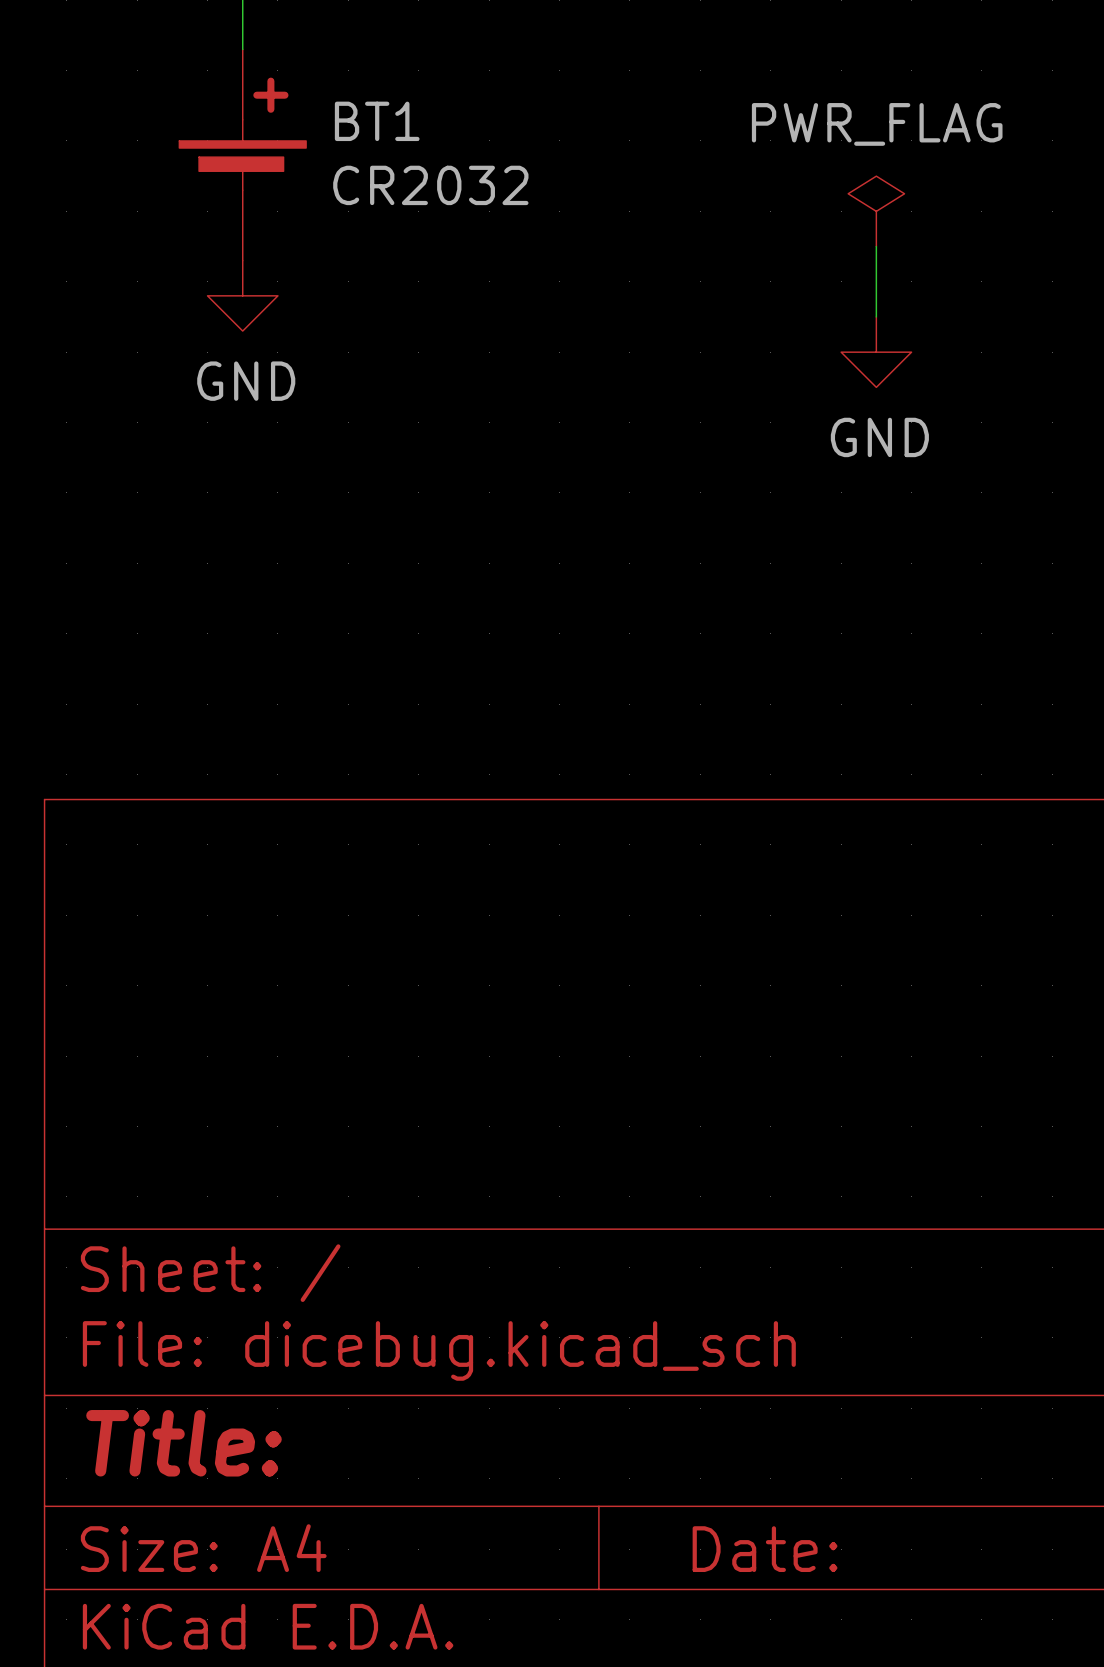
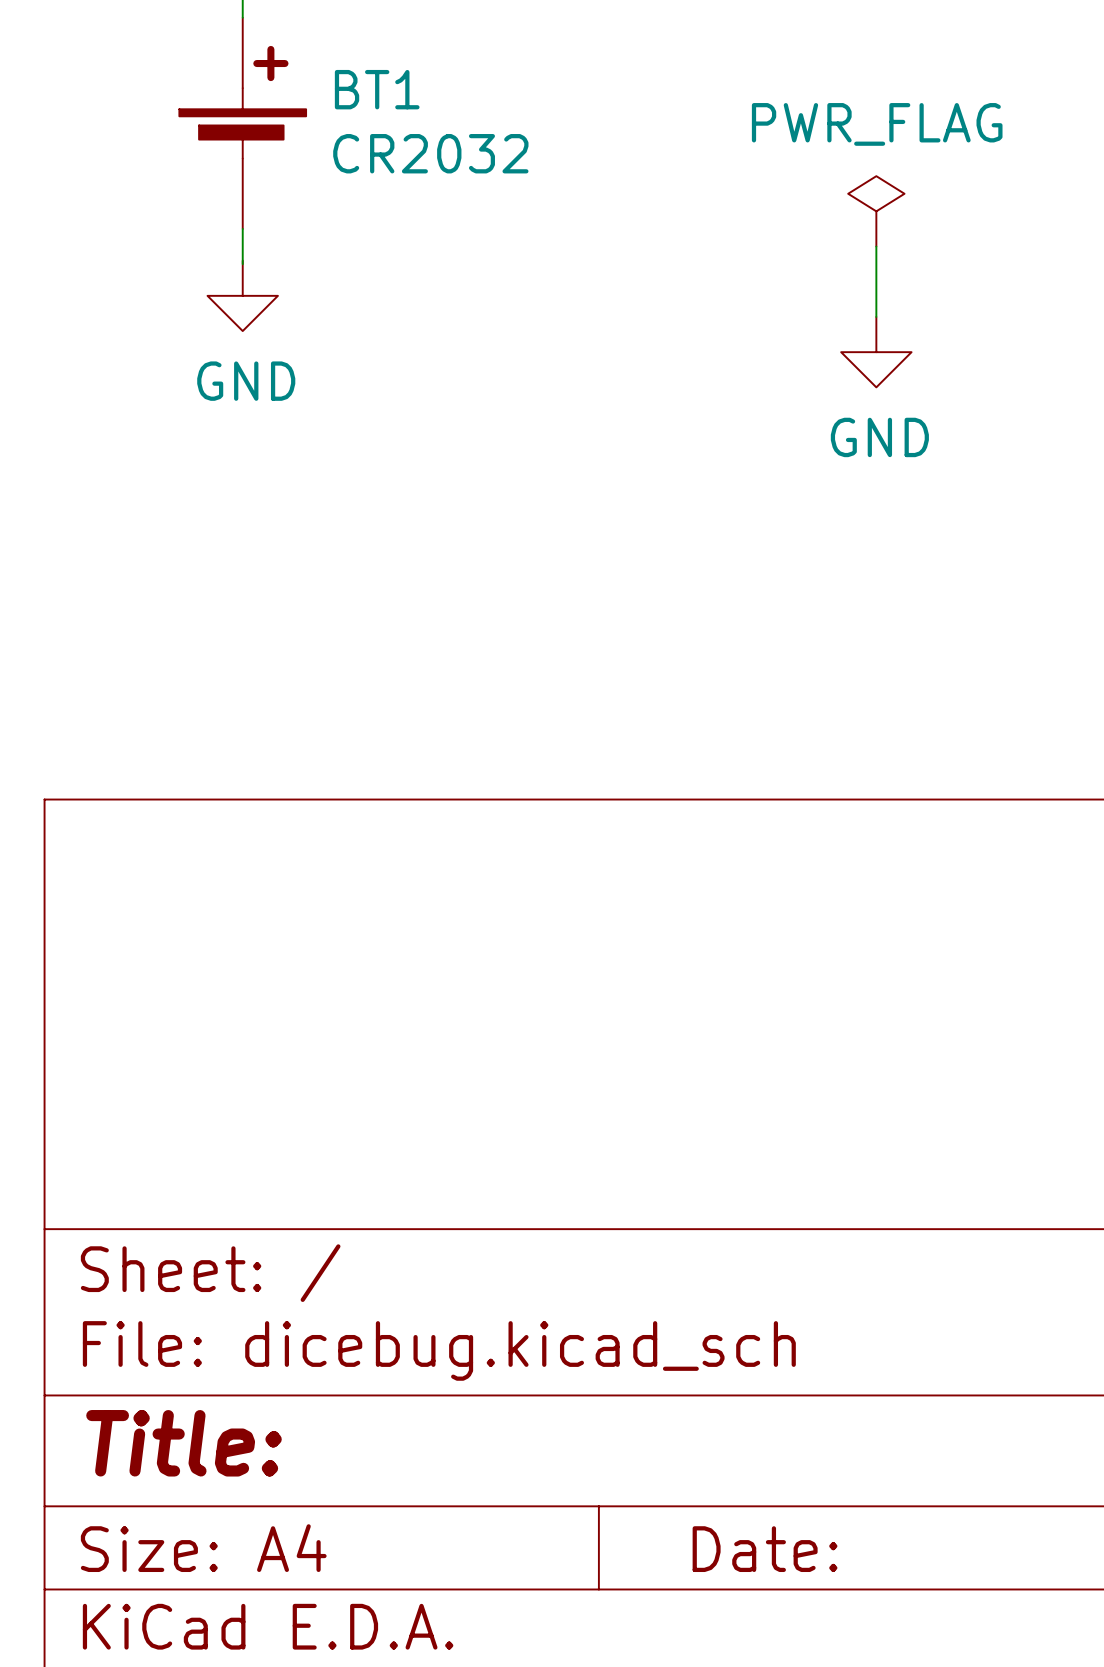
BT1 position: (242, 155) -> (242, 123)

